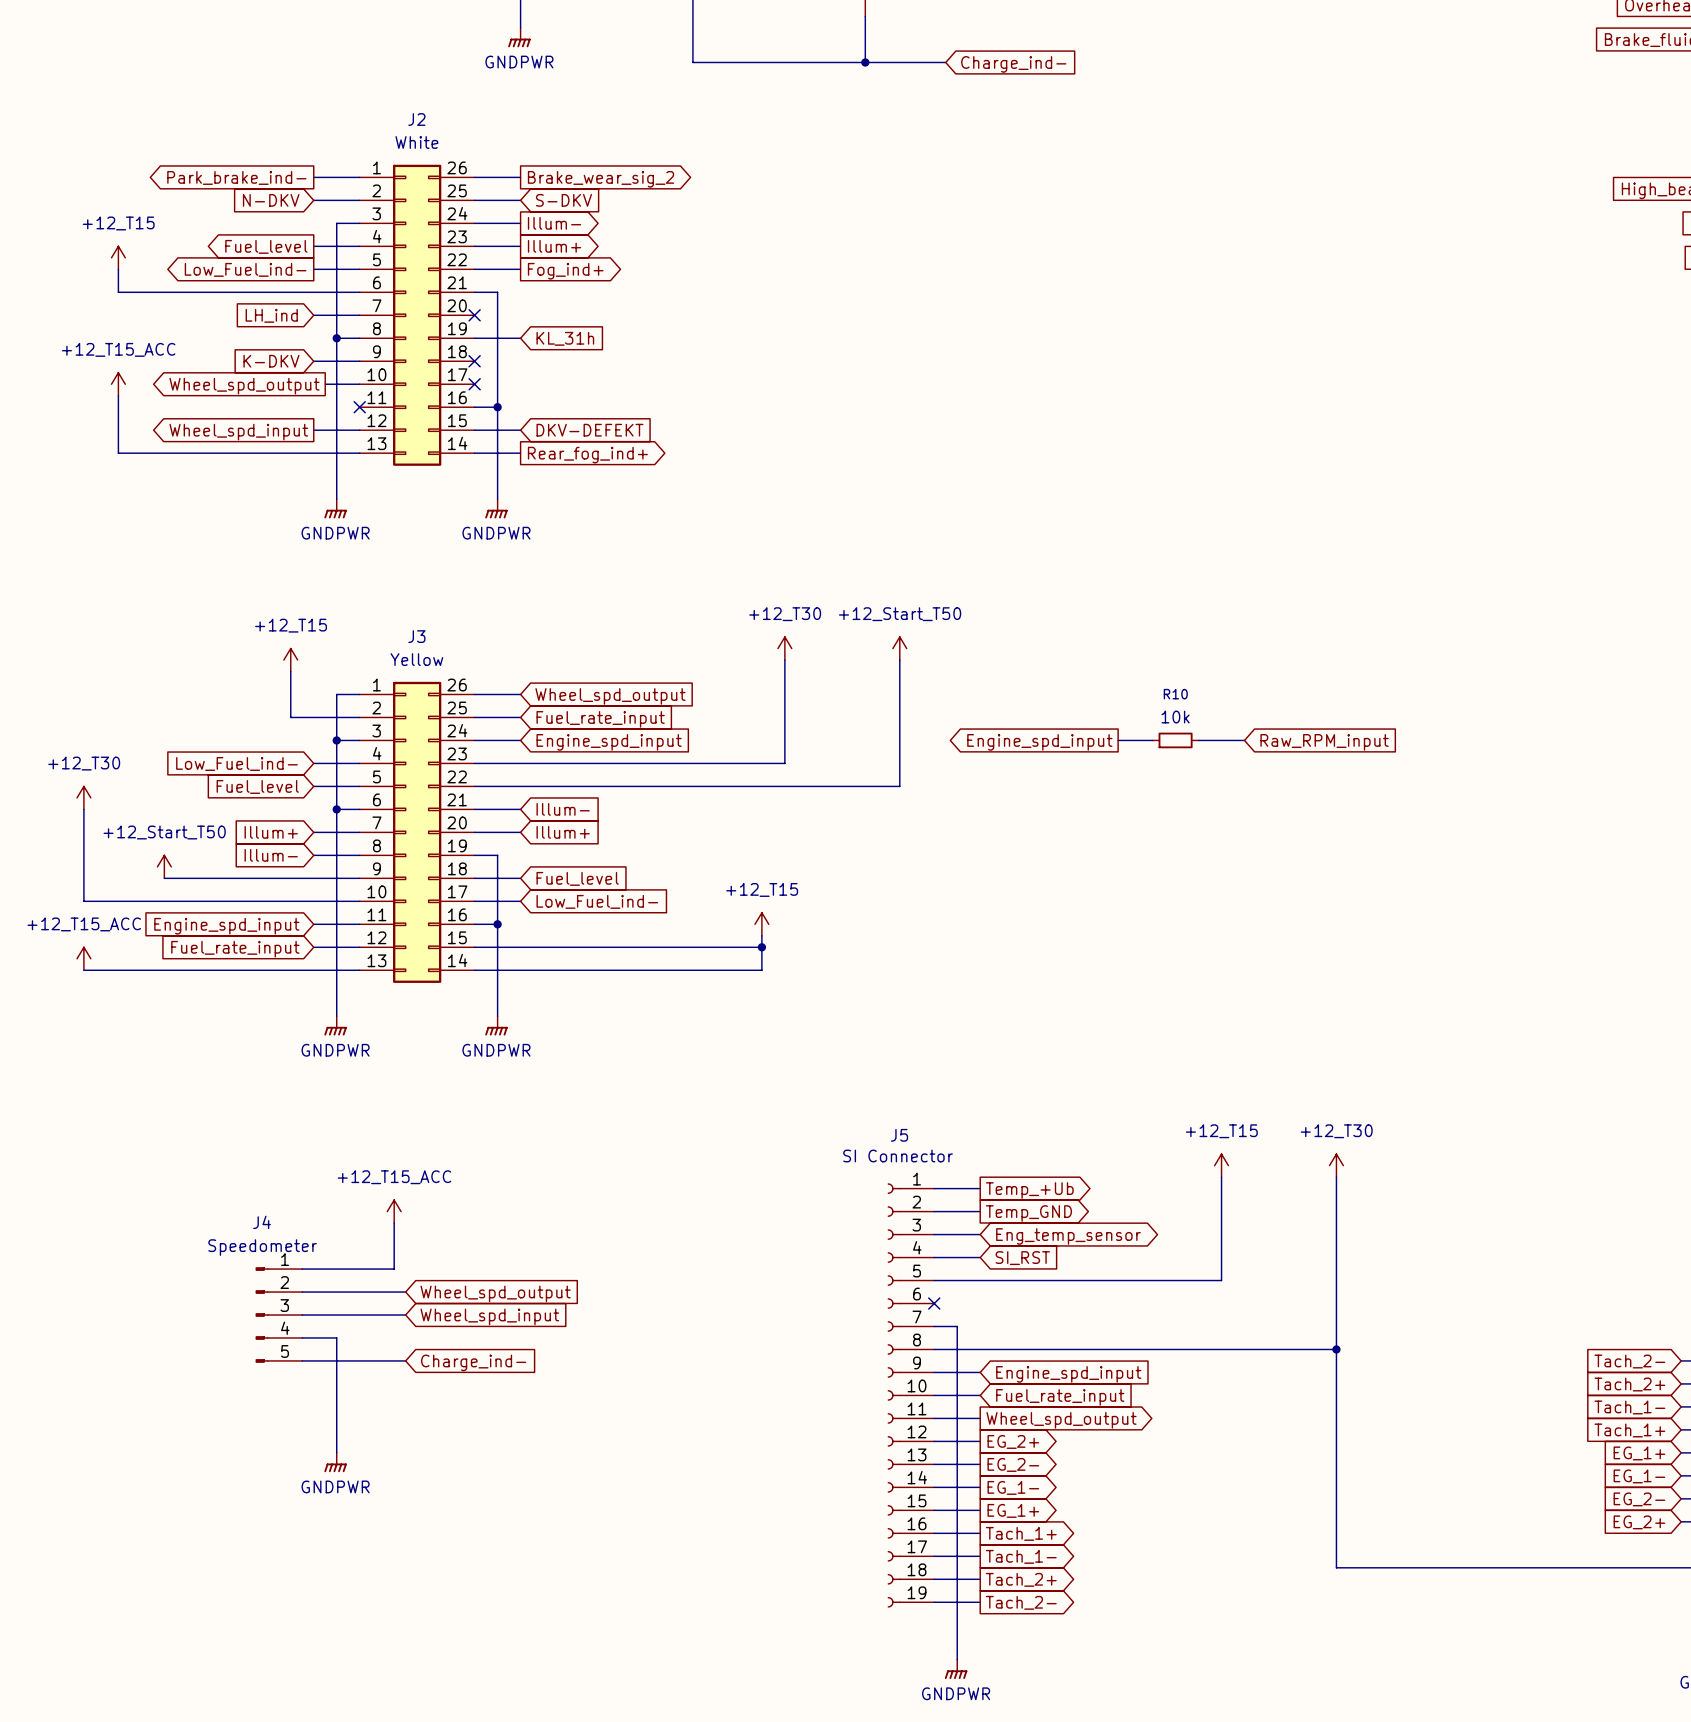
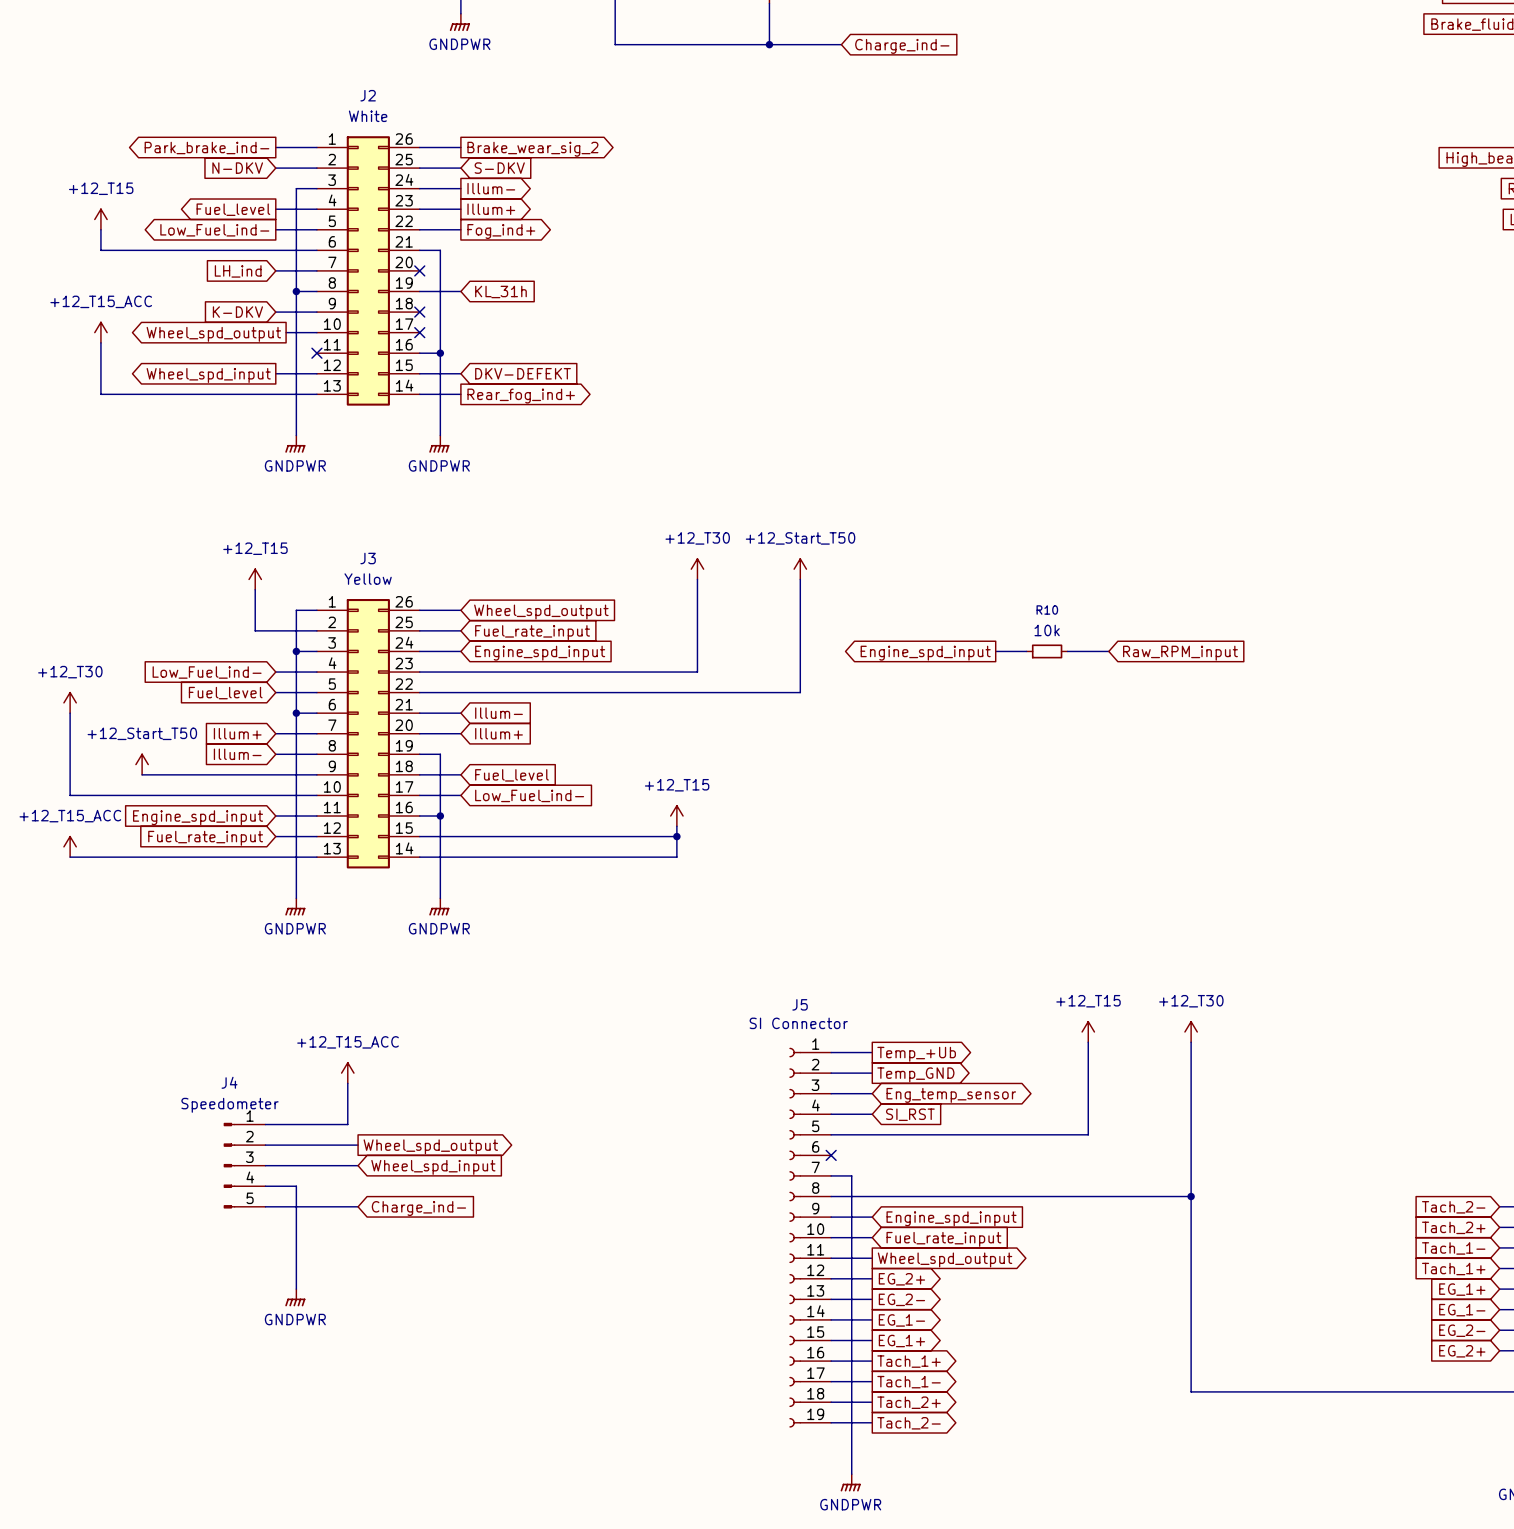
global label shape: input (495, 1293) -> output (430, 1146)

